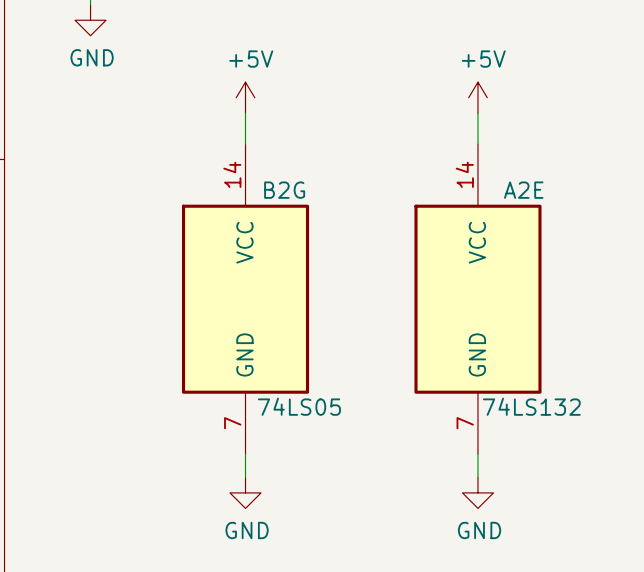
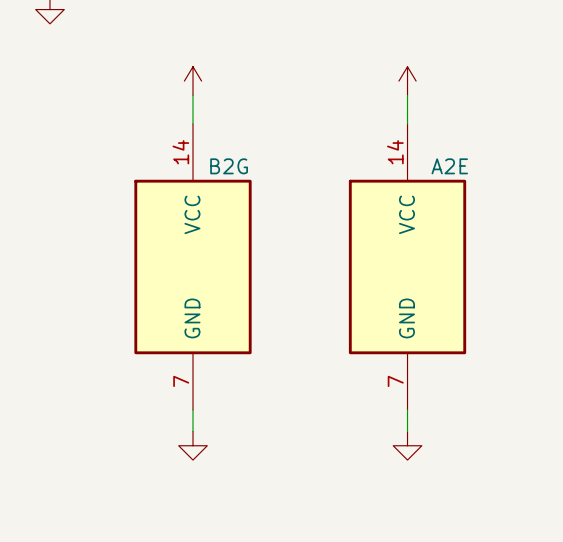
power symbol text: GND (92, 57) -> none
power symbol text: +5V (251, 59) -> none
power symbol text: +5V (483, 59) -> none
B2G value: 74LS05 (299, 406) -> none
A2E value: 74LS132 (531, 406) -> none
power symbol text: GND (247, 530) -> none
power symbol text: GND (479, 530) -> none

